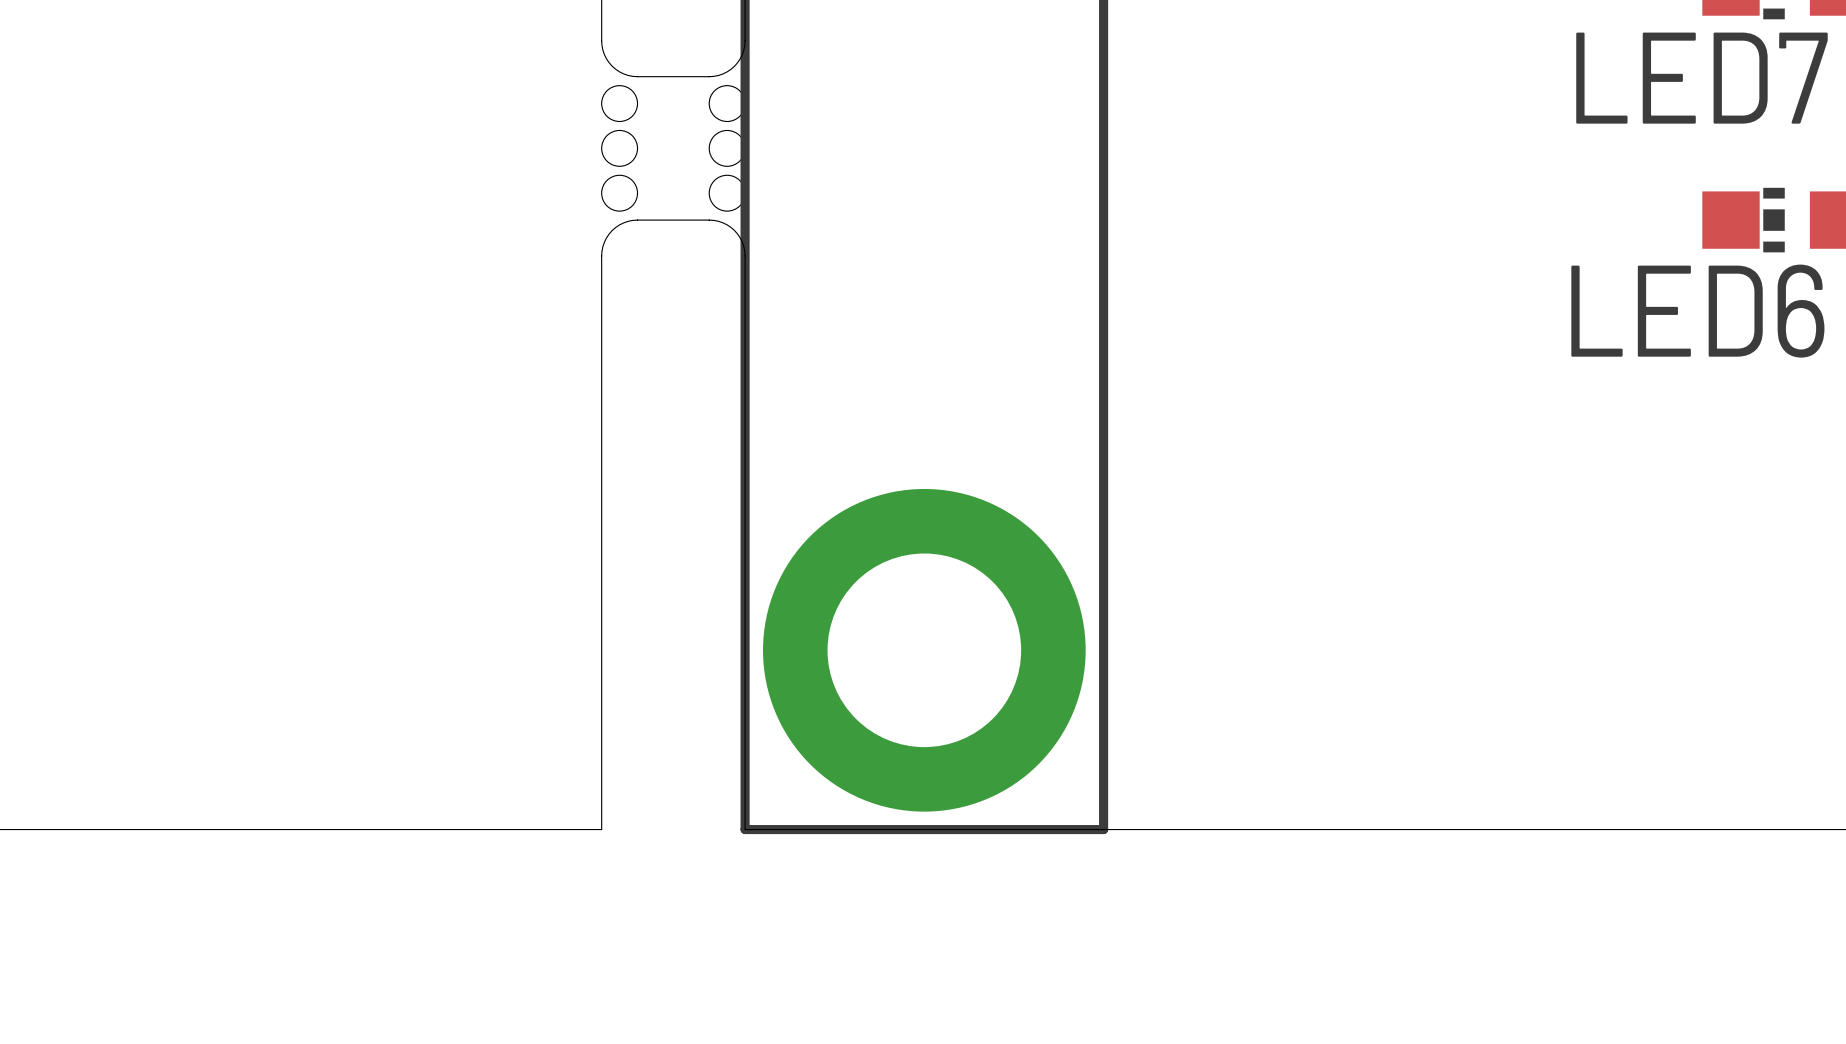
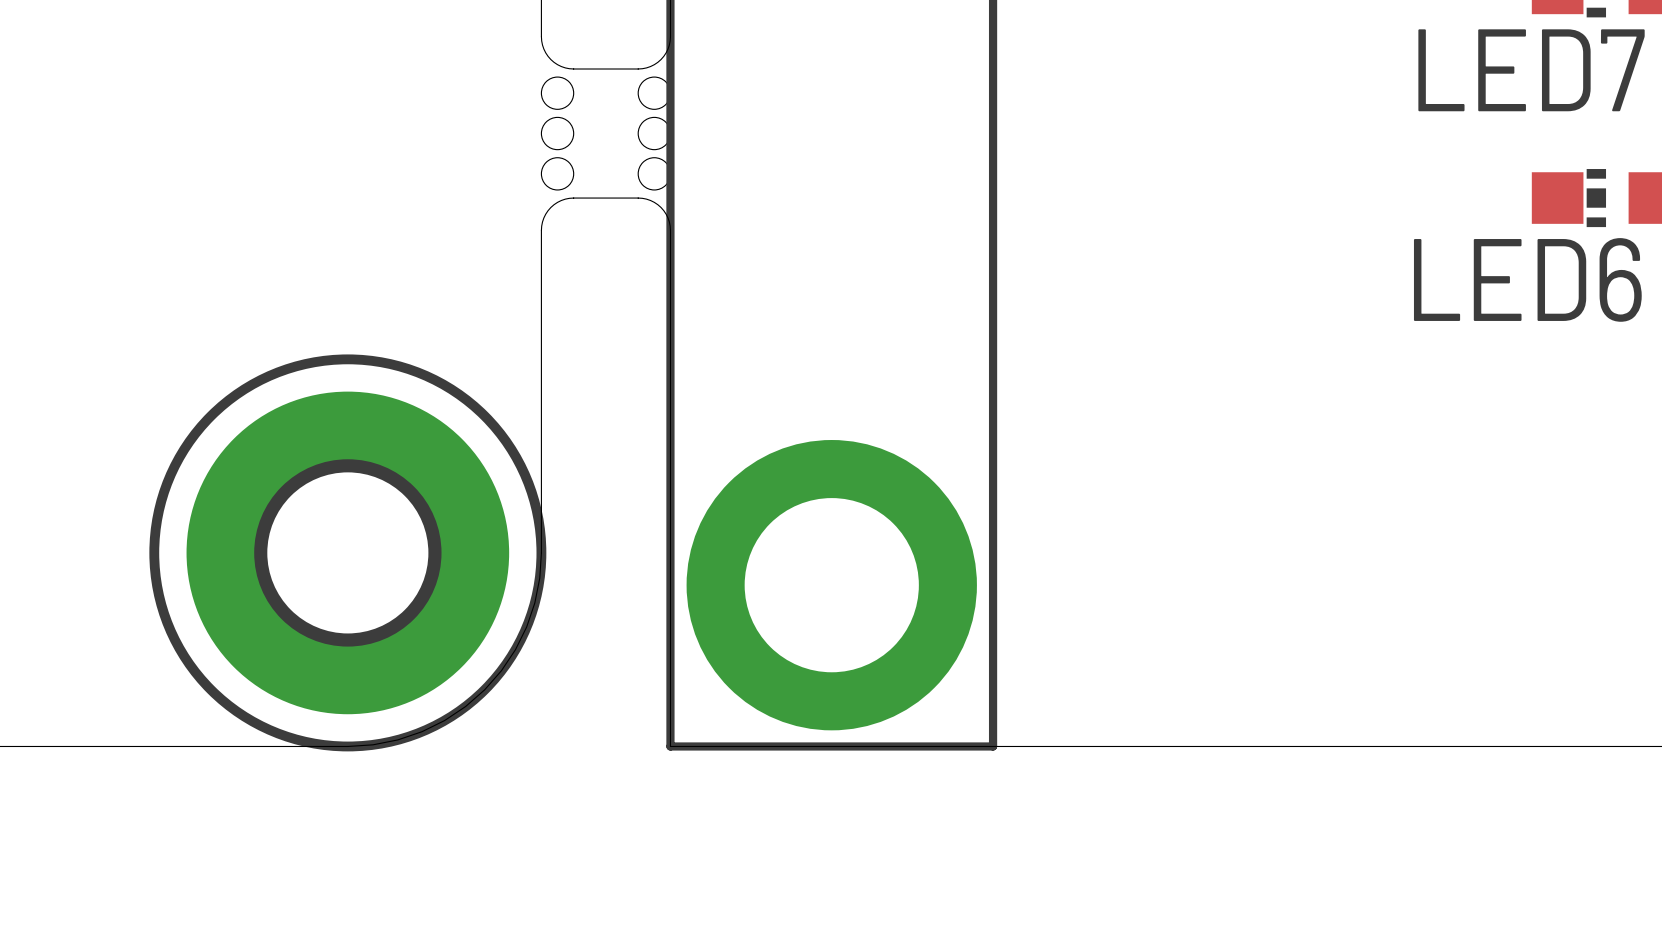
part: none -> (347, 552)
board edge: (601, 614) (601, 829) (386, 829) -> (541, 552) (539, 578) (534, 603) (526, 626) (515, 649) (501, 670) (484, 689) (465, 706) (444, 720) (421, 731) (397, 739) (373, 744) (347, 746)

